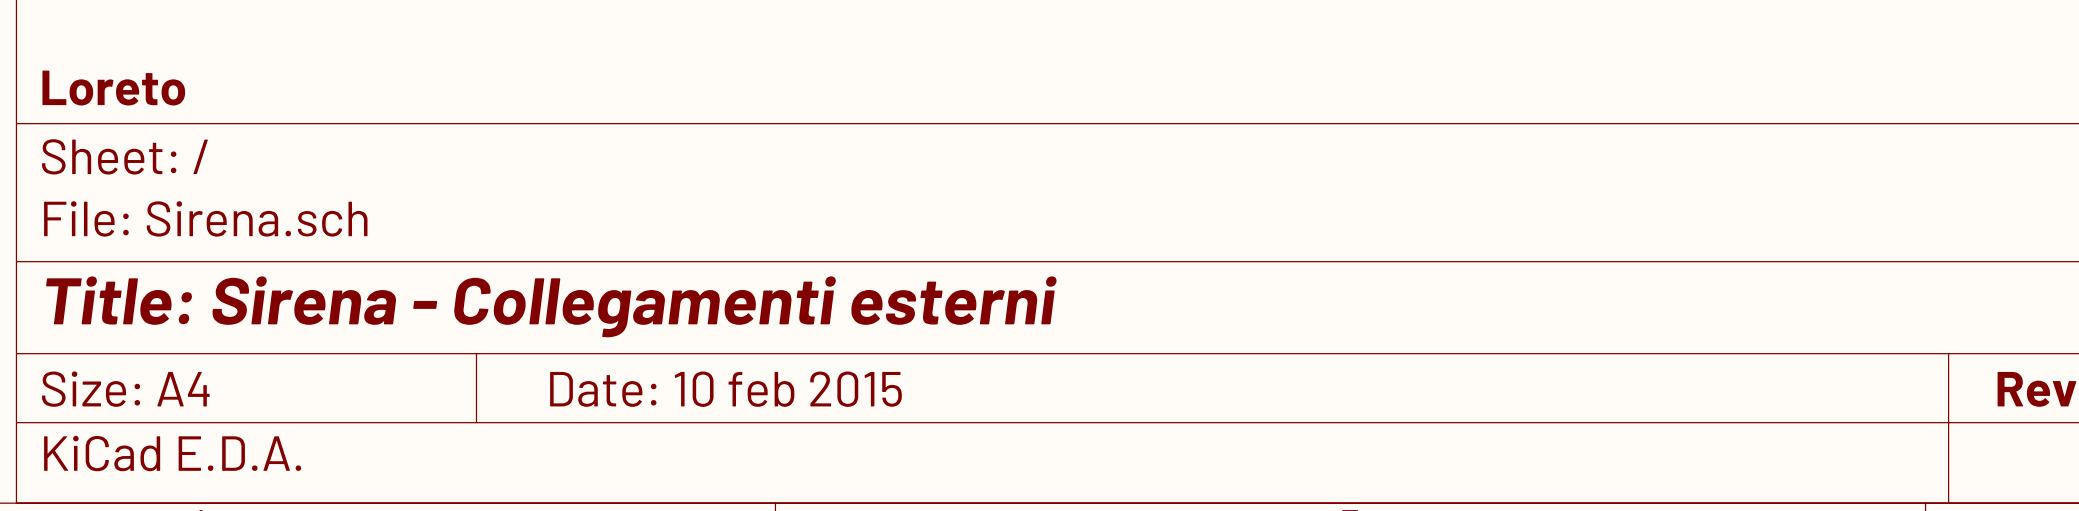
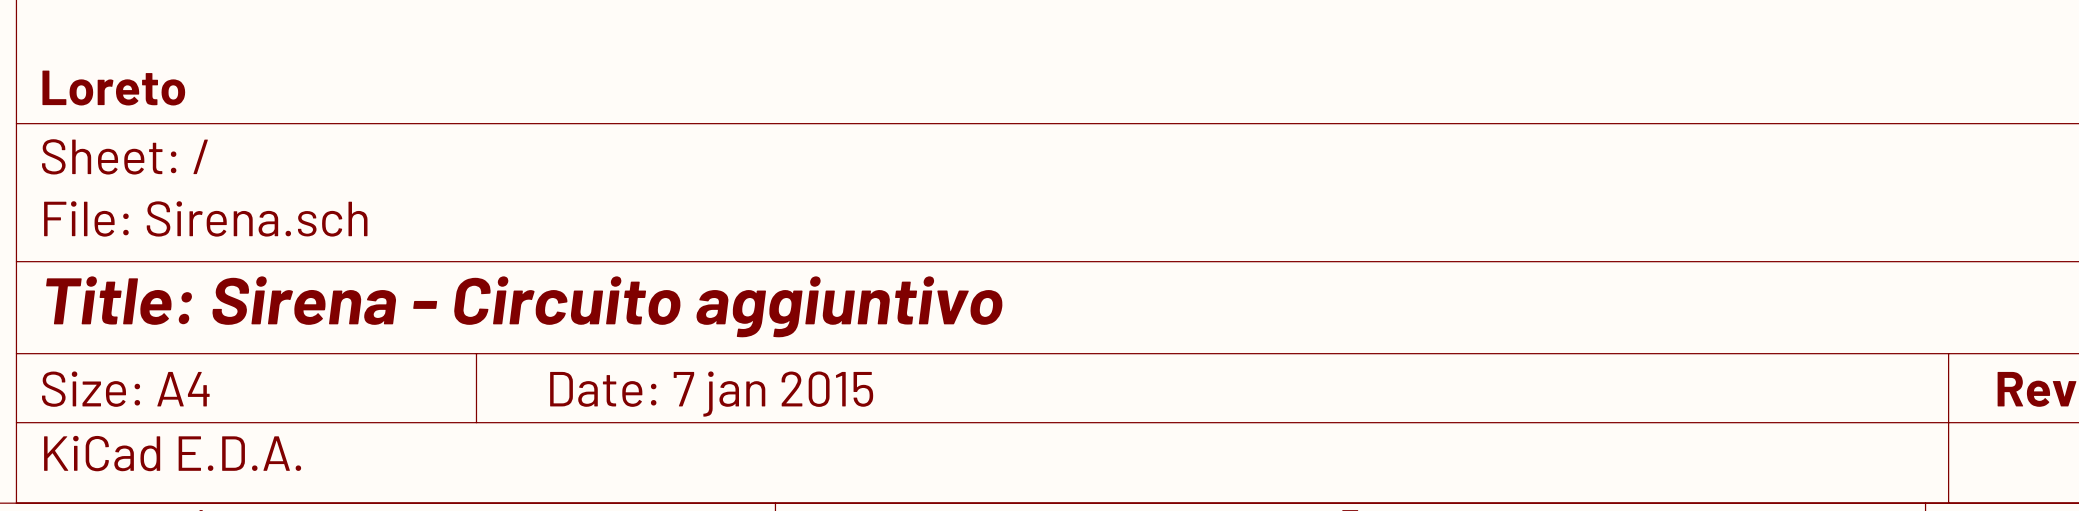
title block: Title: Sirena - Collegamenti esterni (551, 306) -> Title: Sirena - Circuito aggiuntivo (524, 306)
title block: Date: 10 feb 2015 (725, 389) -> Date: 7 jan 2015 (711, 394)

